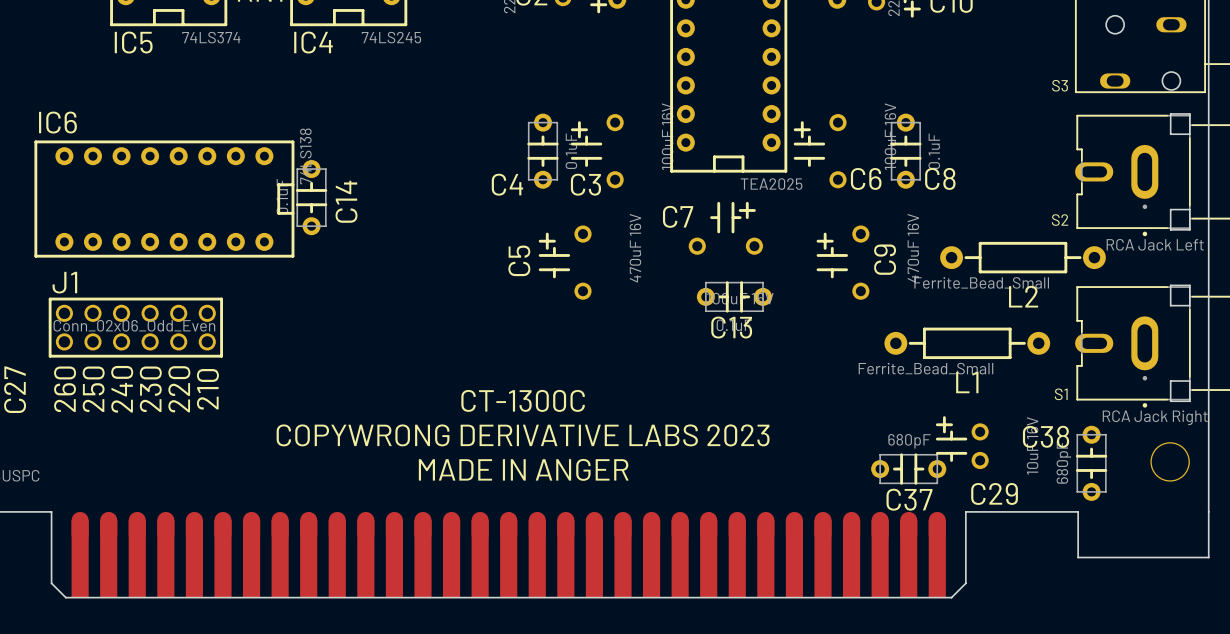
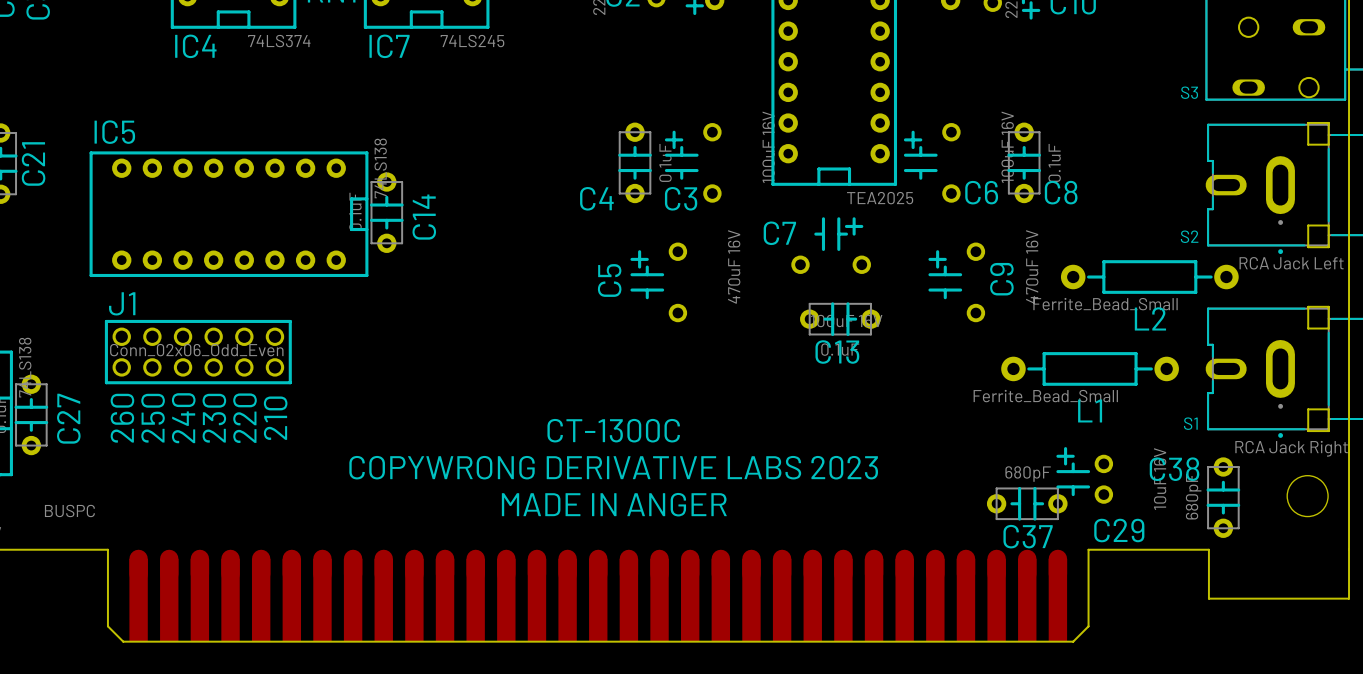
IC5 name: IC5 (133, 42) -> IC4 (195, 46)
IC4 name: IC4 (313, 42) -> IC7 (389, 46)
IC6 name: IC6 (57, 122) -> IC5 (114, 132)

